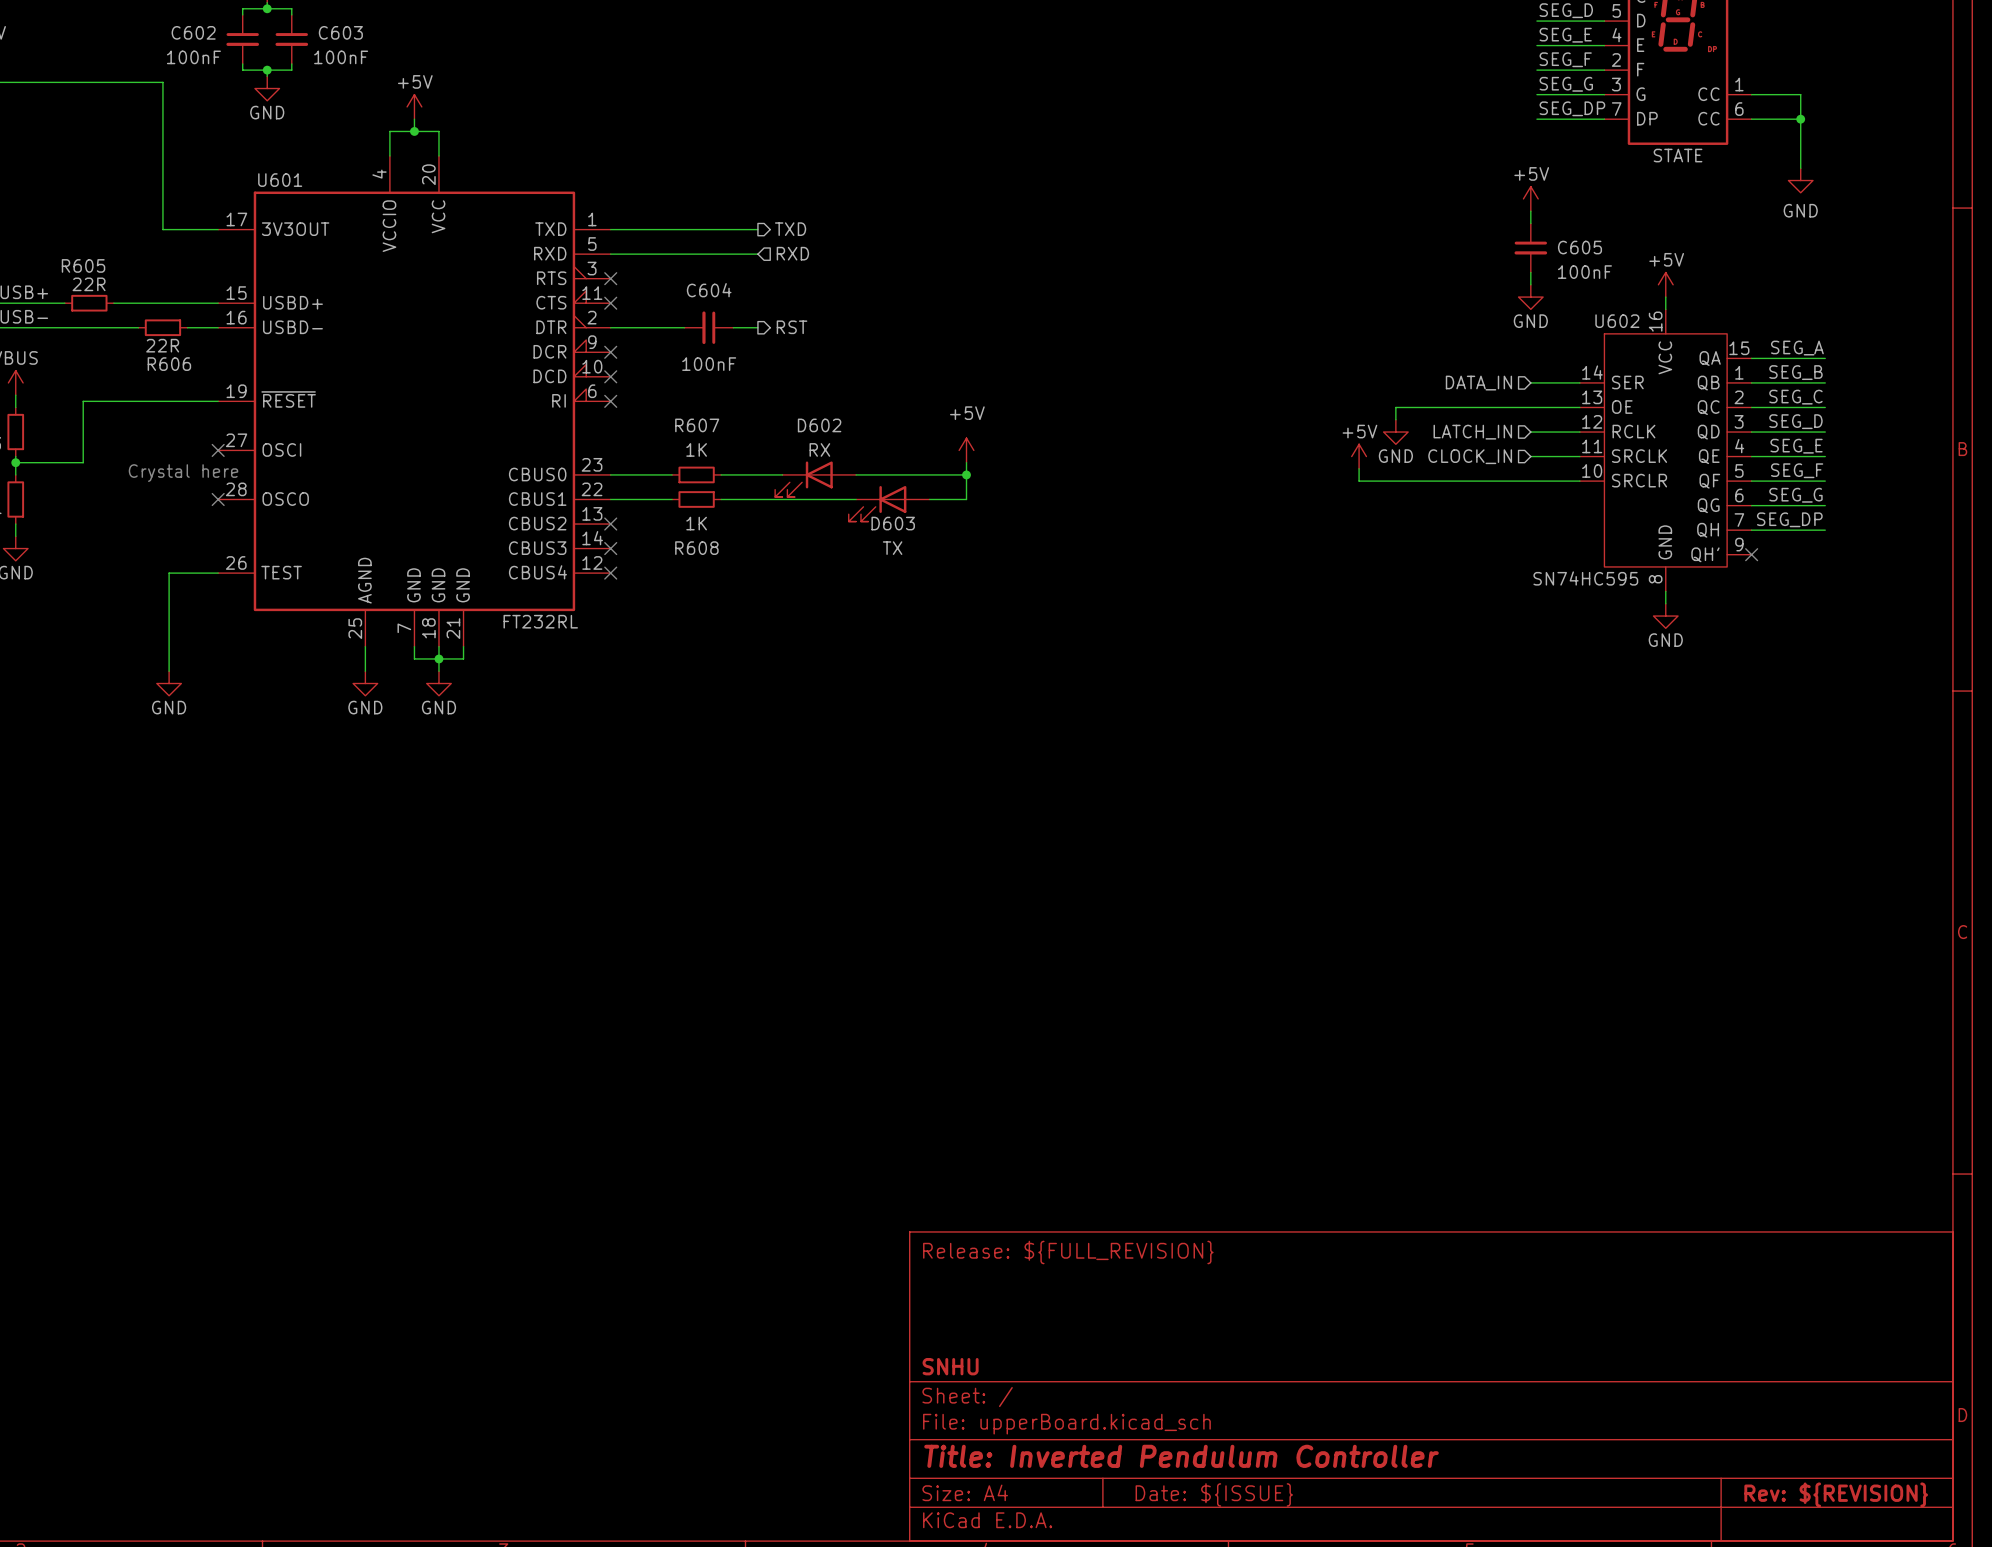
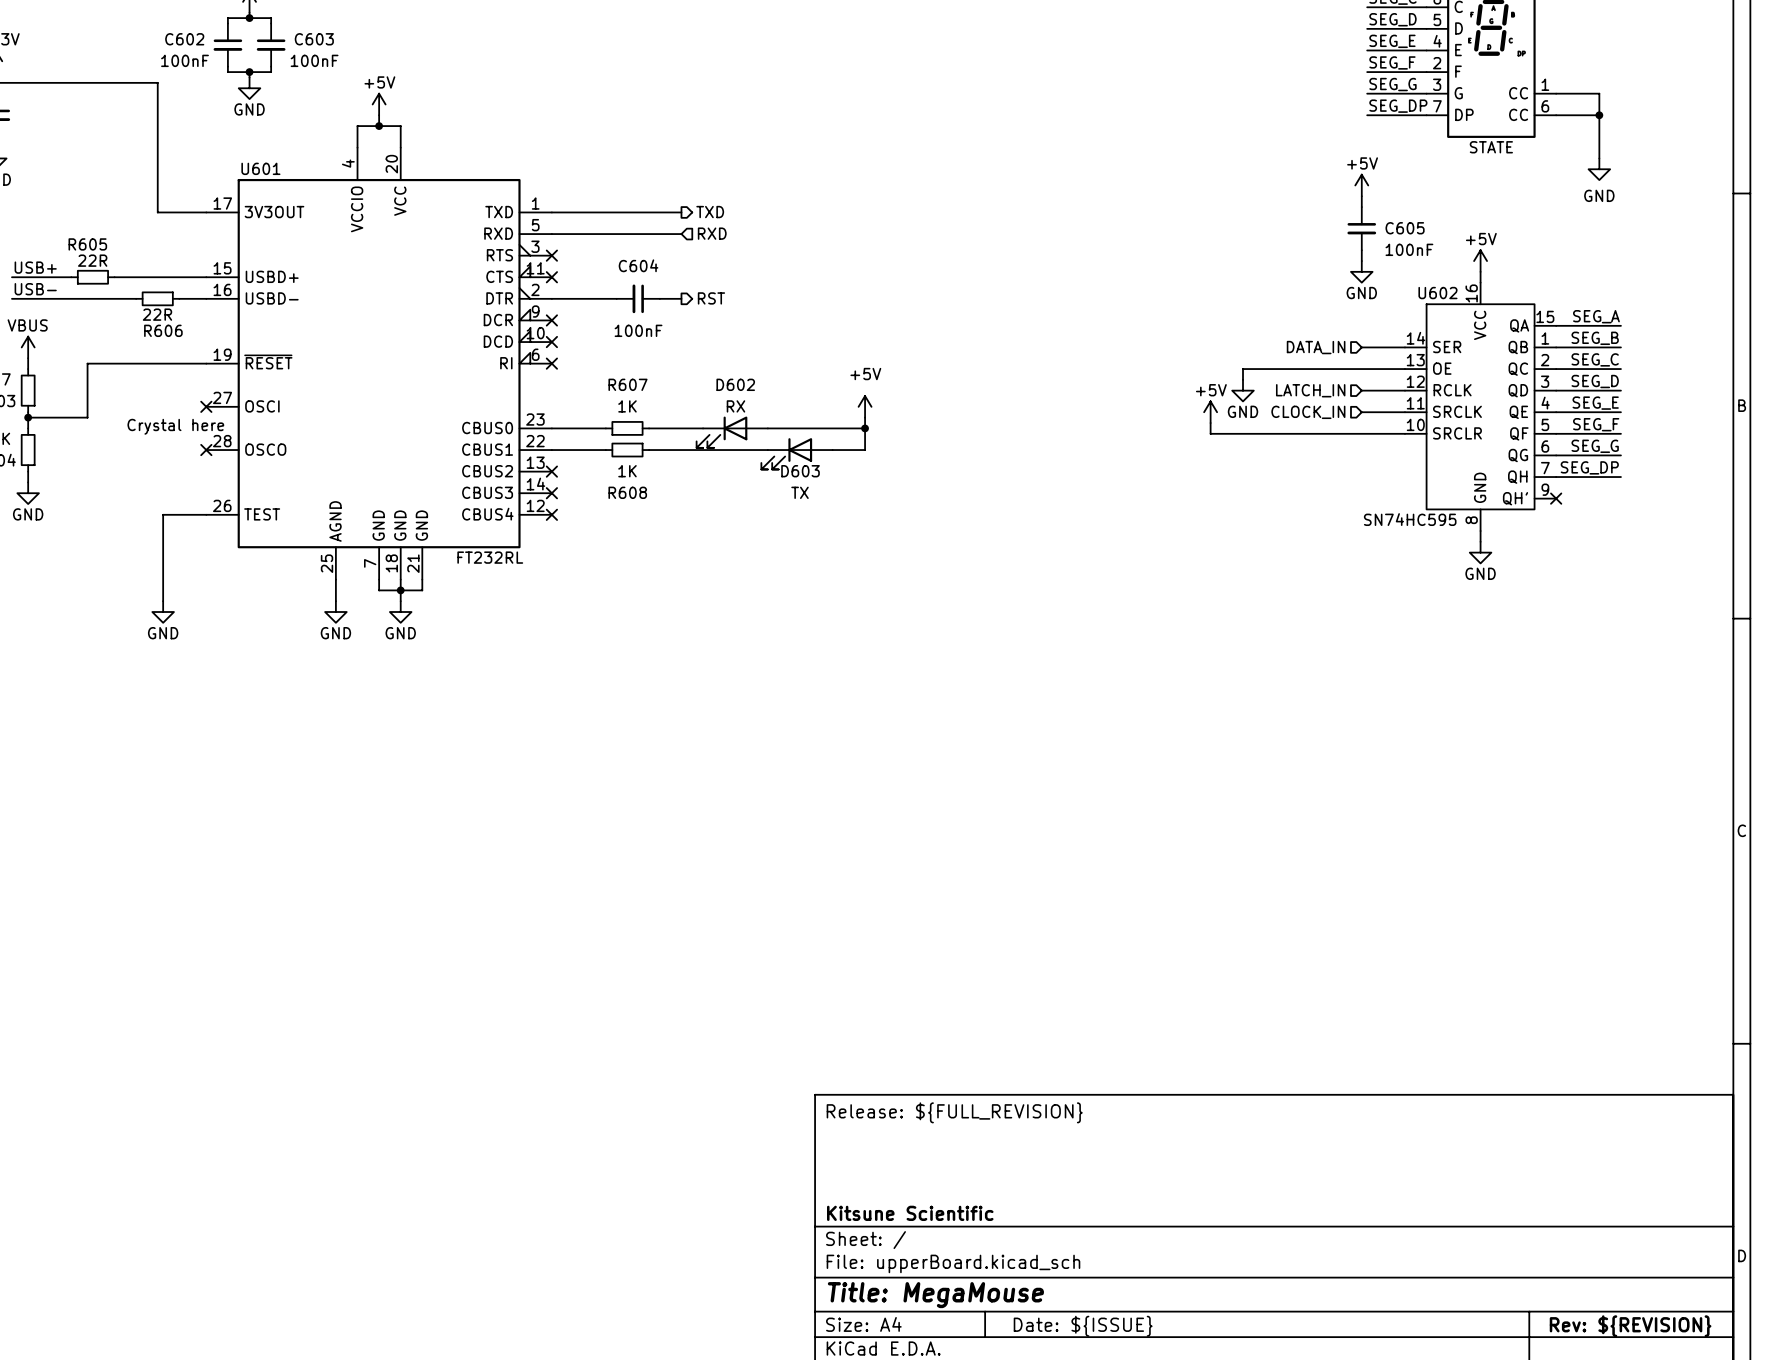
title block: SNHU (950, 1366) -> Kitsune Scientific (910, 1213)
title block: Title: Inverted Pendulum Controller (1181, 1456) -> Title: MegaMouse (935, 1295)

